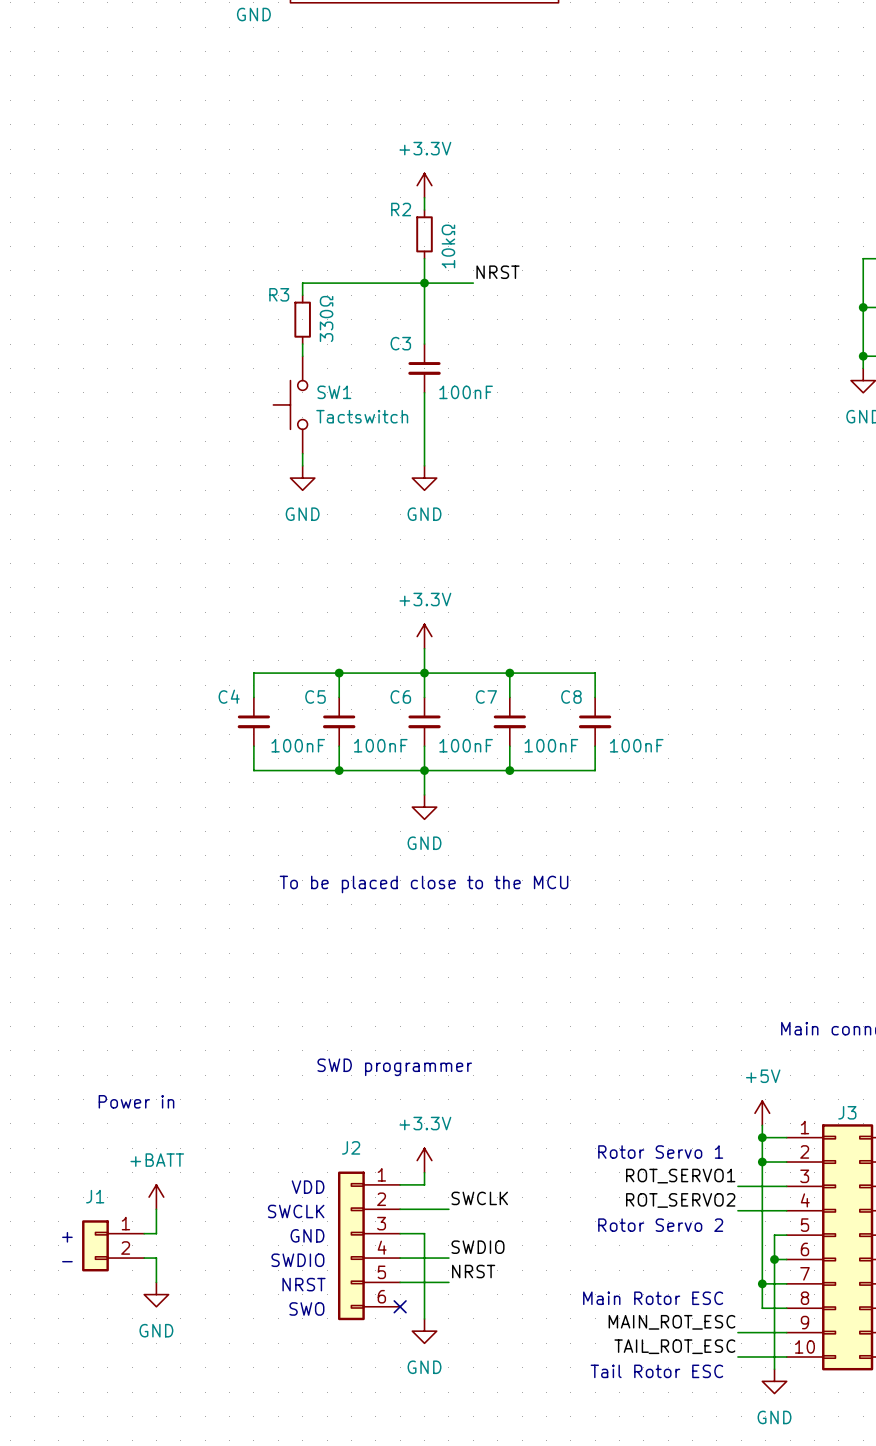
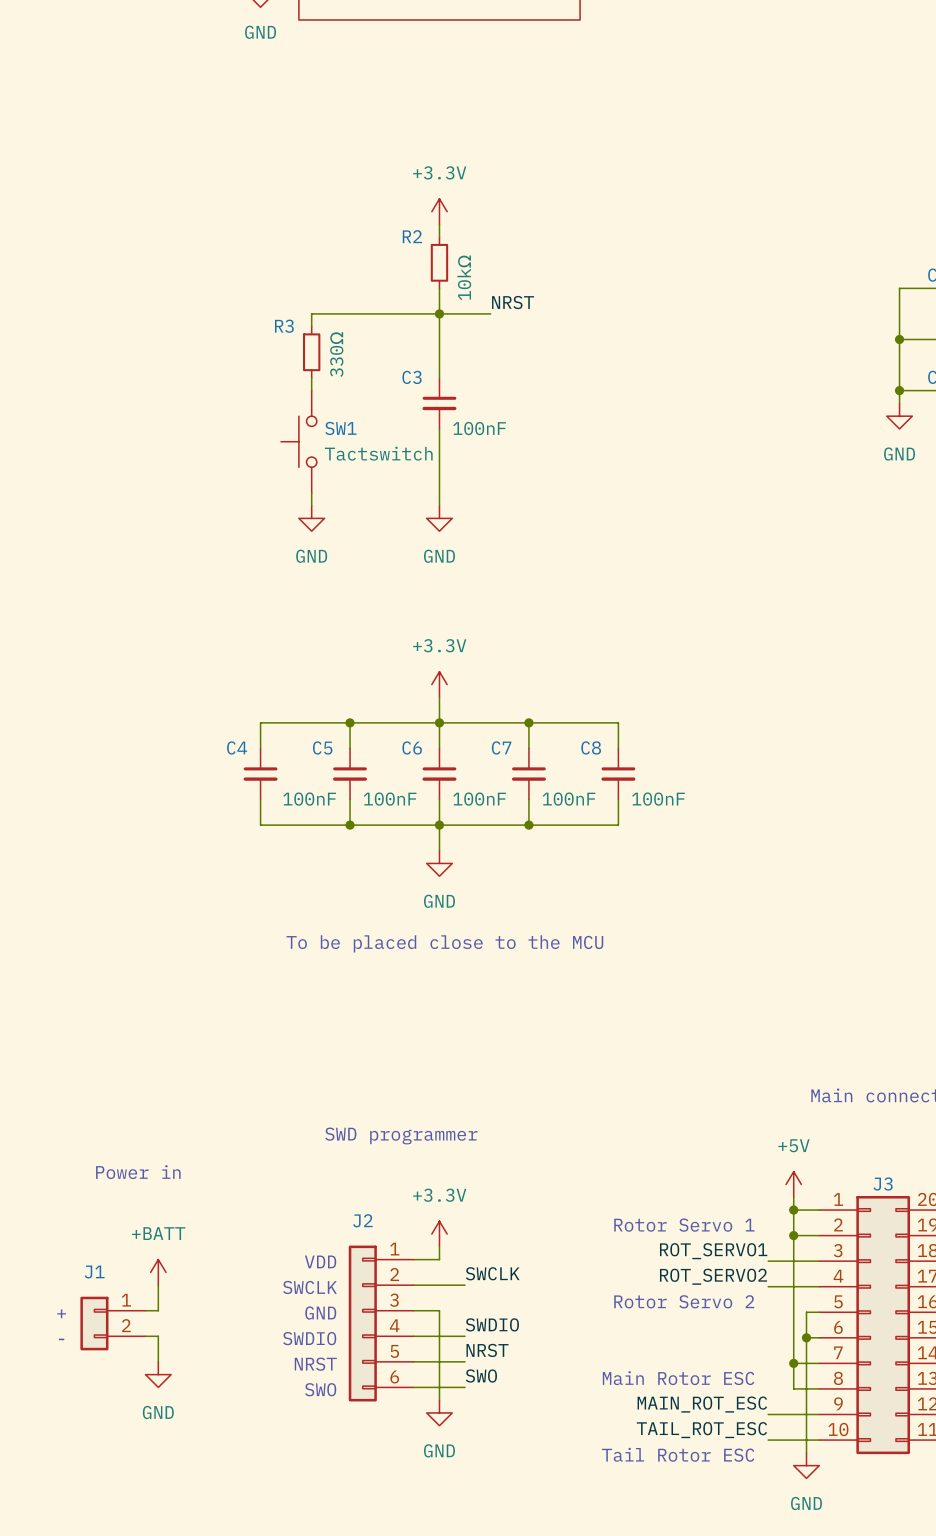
label: none -> SWO (481, 1376)
wire: none -> (413, 1387) (465, 1387)
no-connect mark: (400, 1306) -> none

